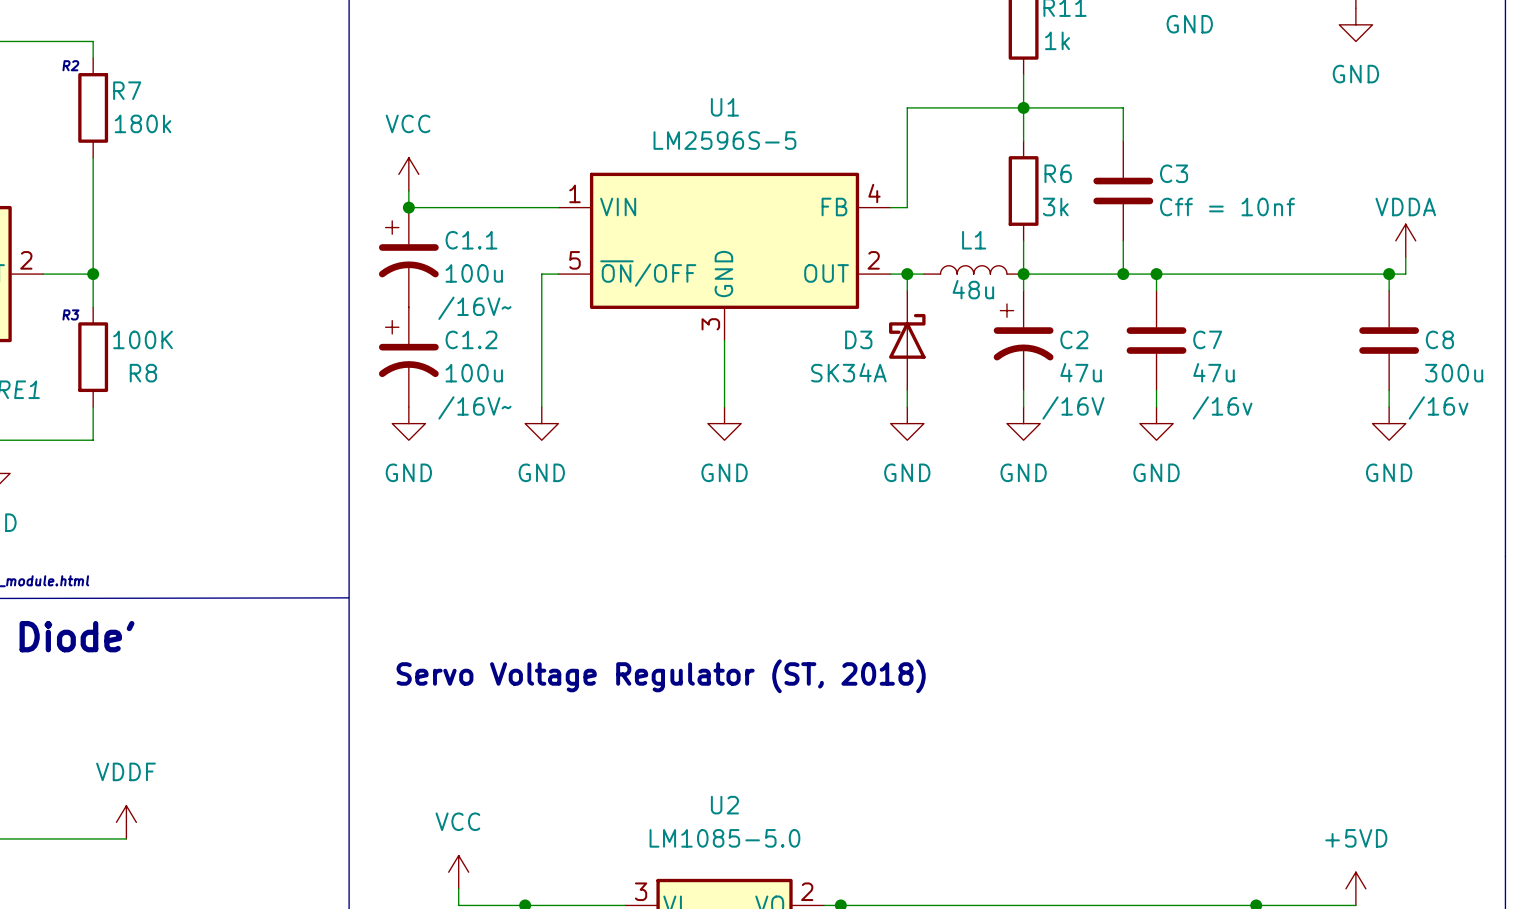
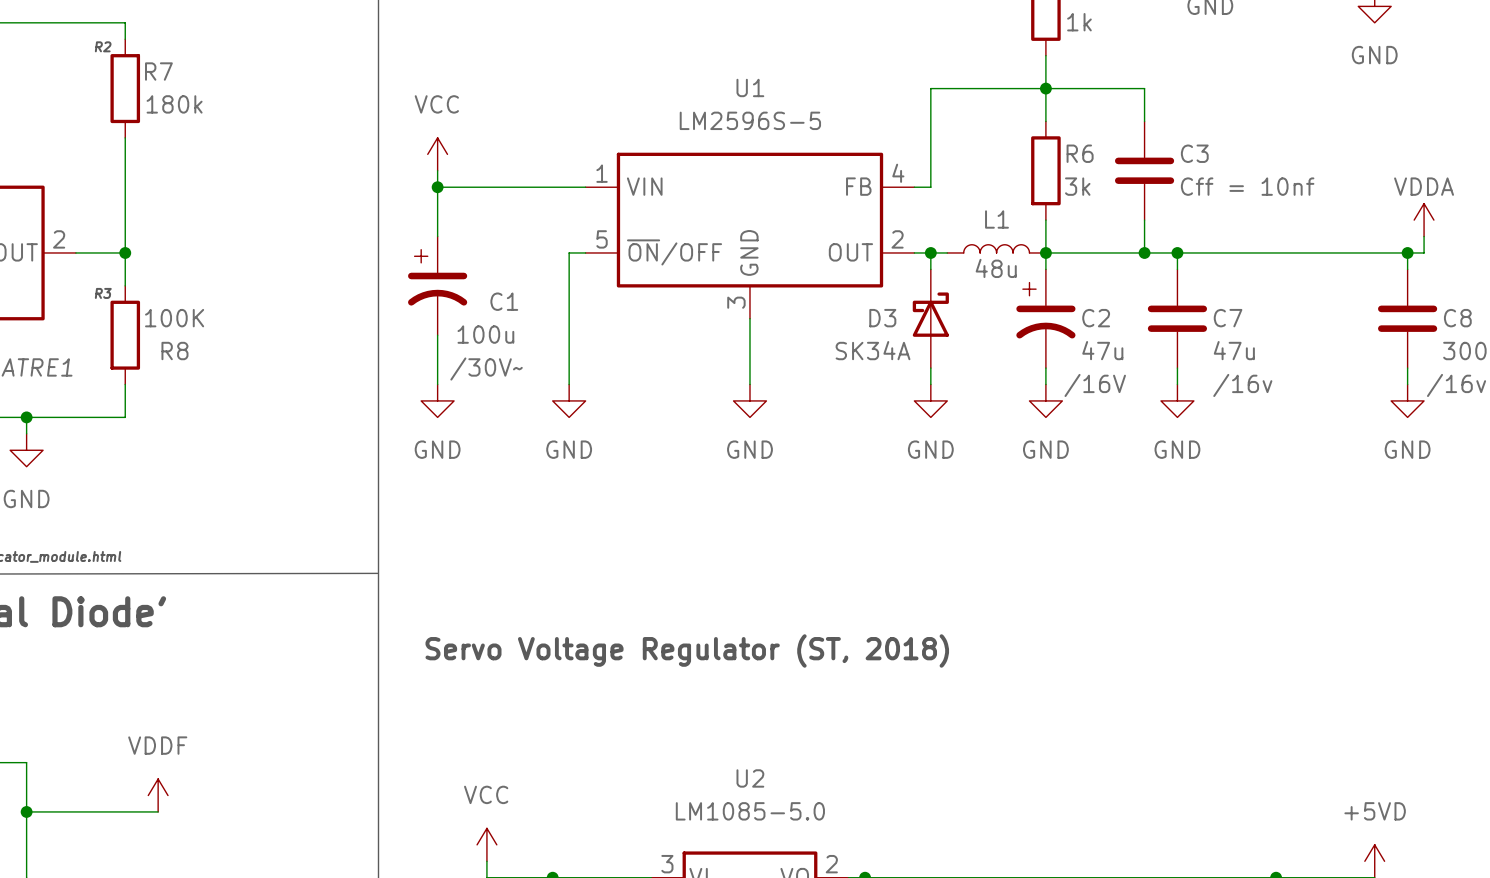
C1.1: 100u (408, 257) -> none
C1: none -> 100u (437, 285)
C1.2: 100u (408, 357) -> none

